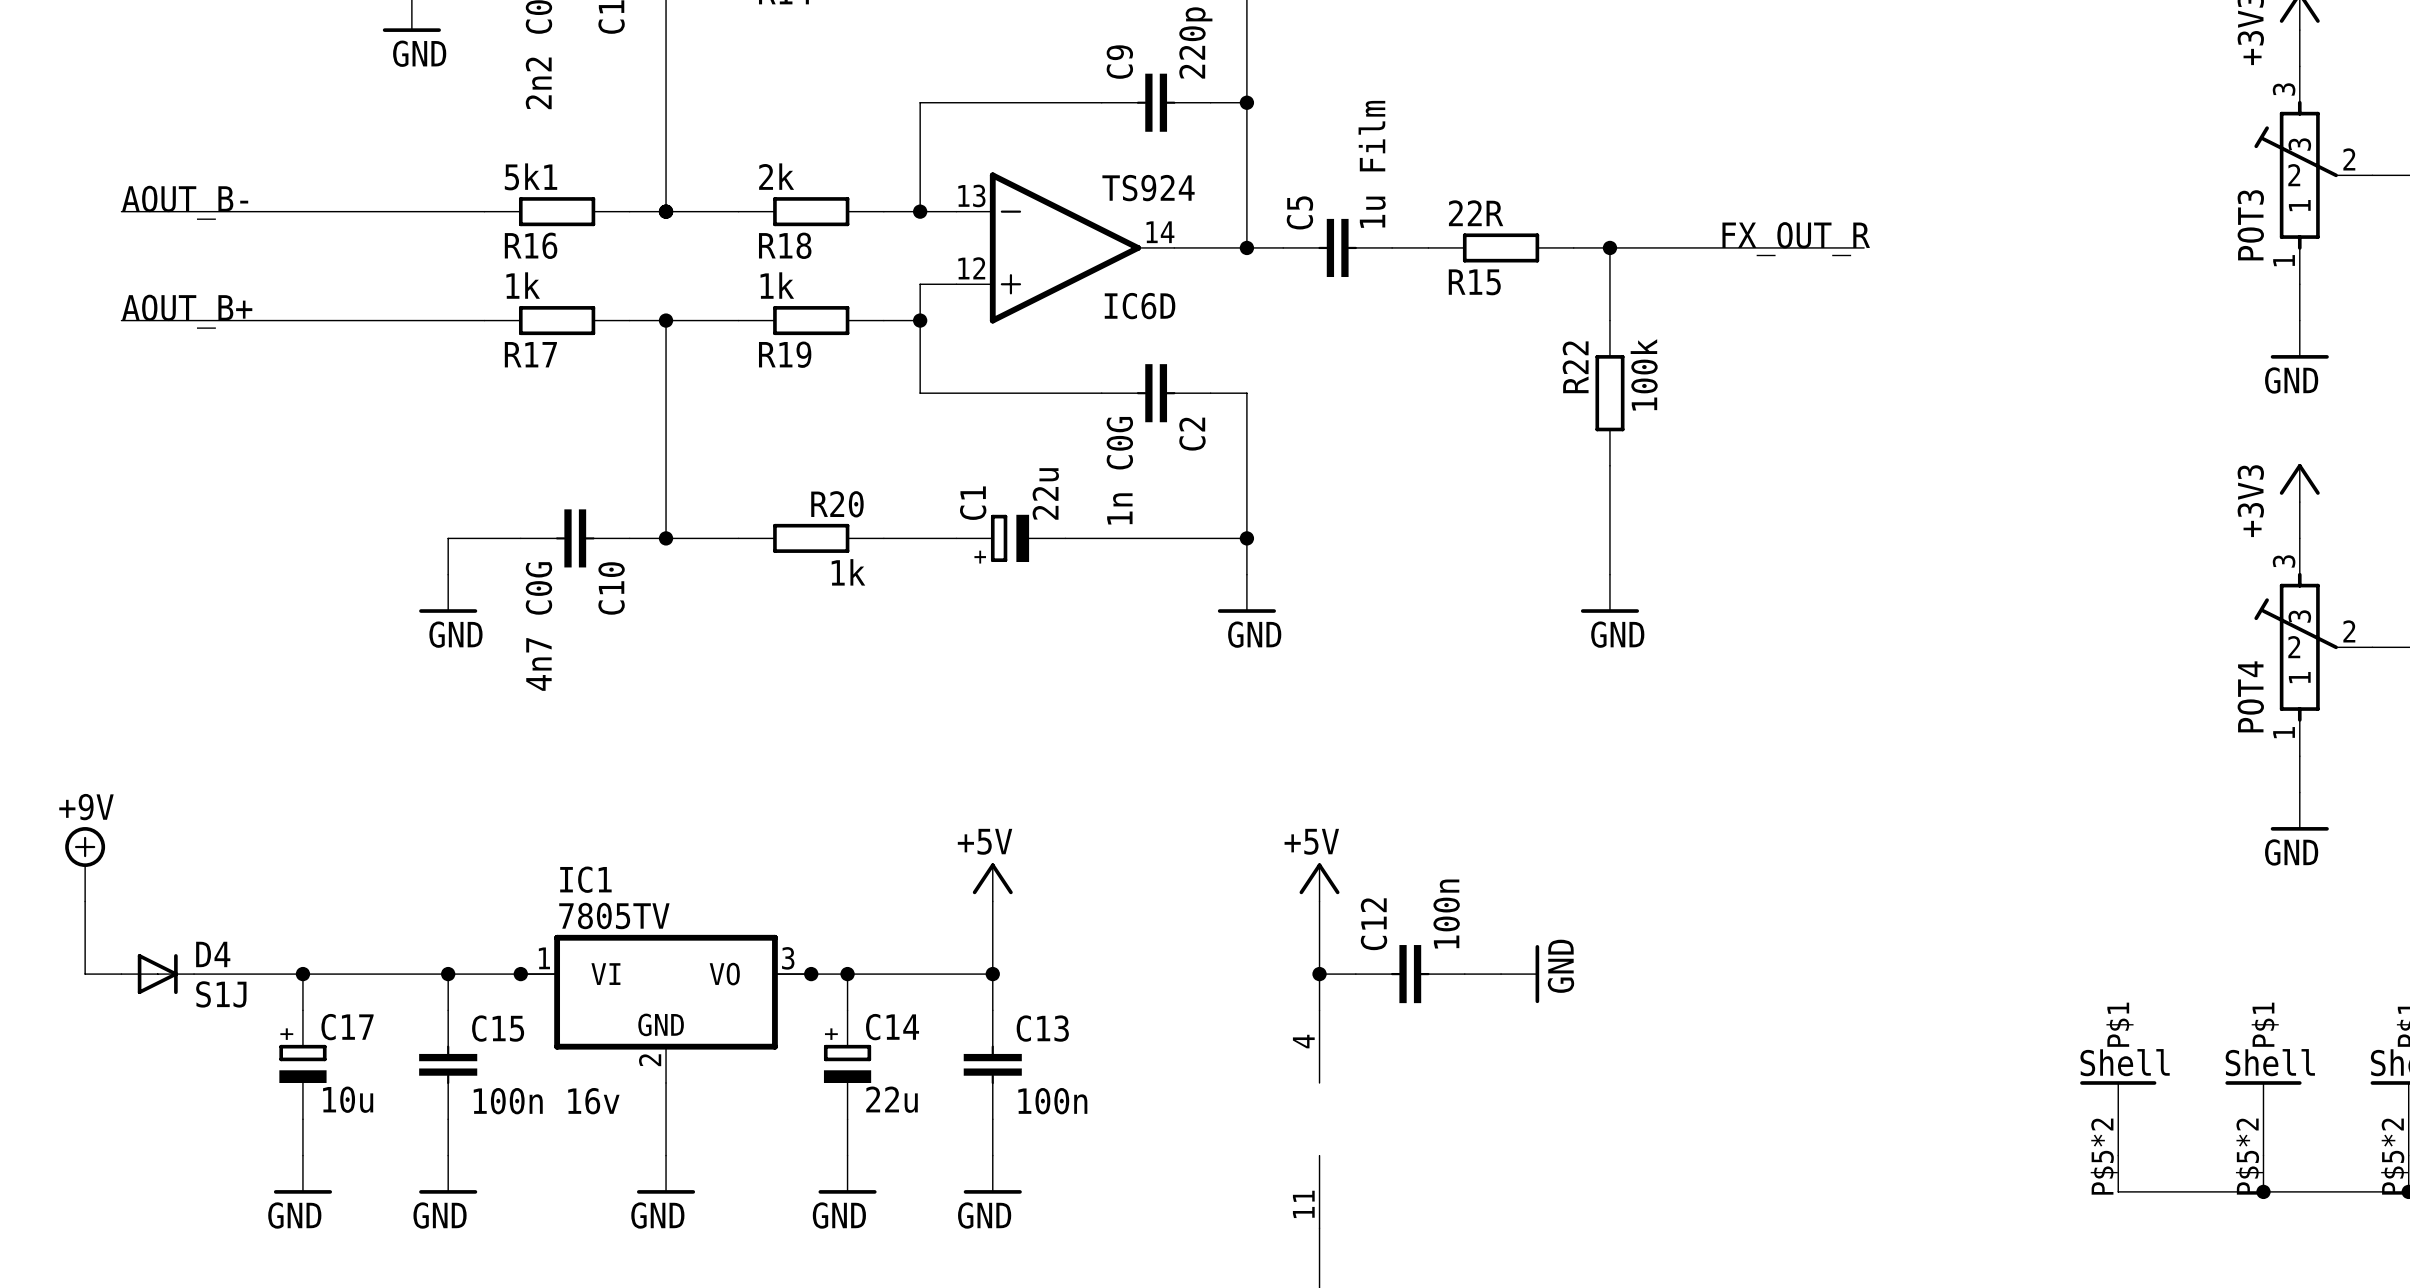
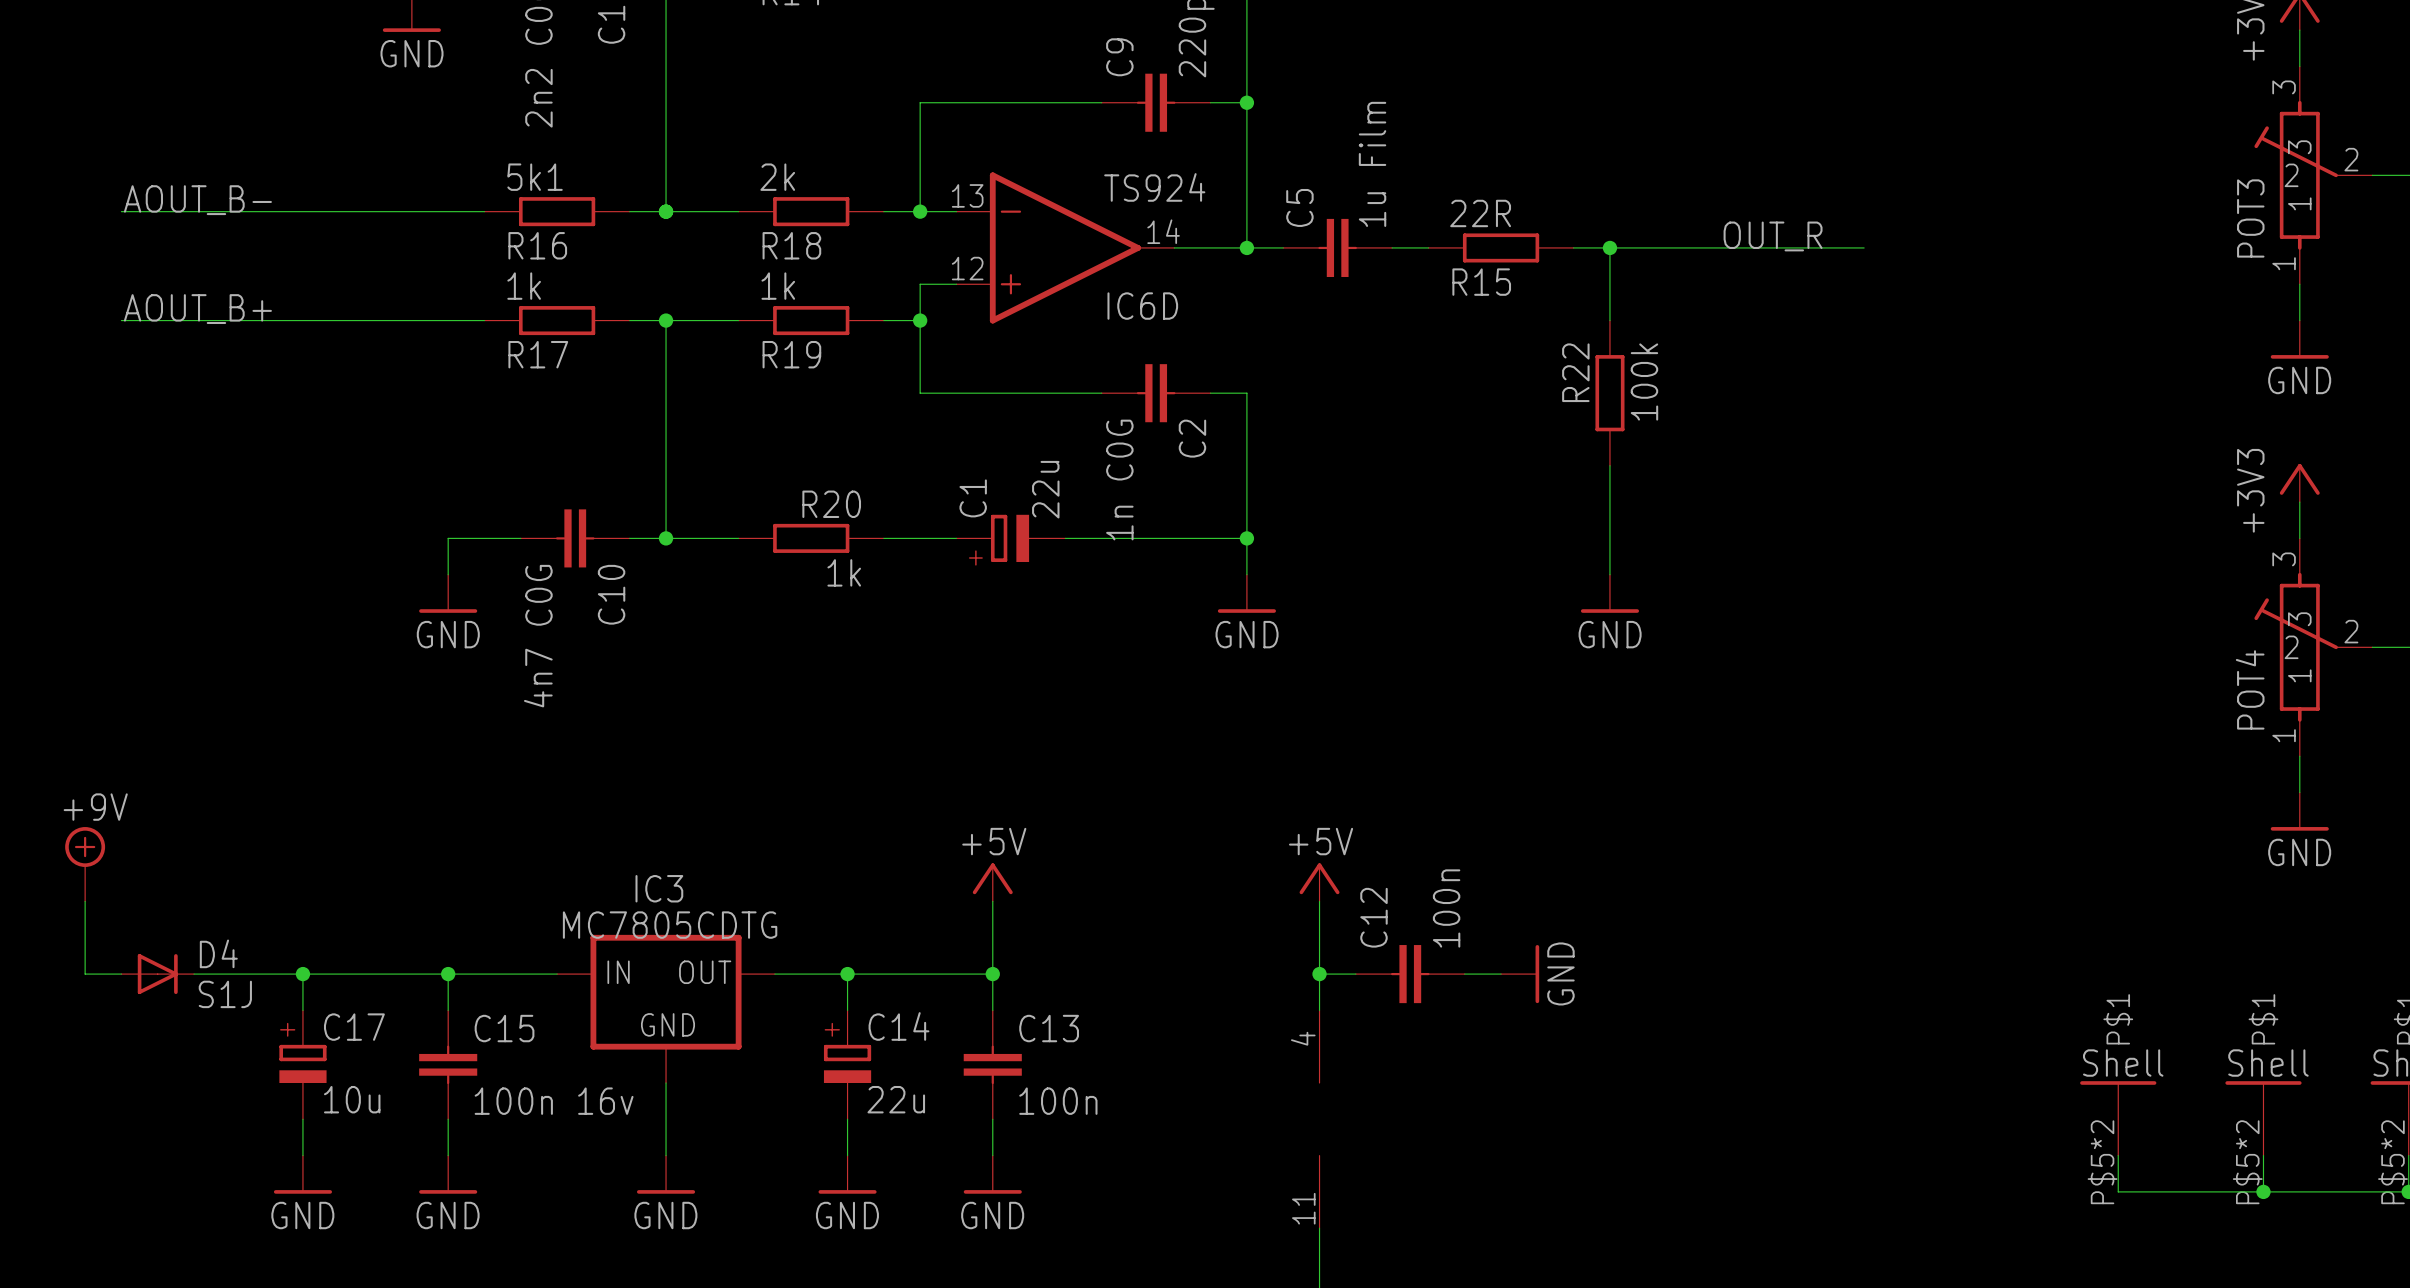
label: FX_OUT_R (1796, 239) -> OUT_R (1773, 236)
junction: (520, 974) -> none
junction: (811, 974) -> none
IC1: 7805TV (666, 1008) -> none
IC3: none -> MC7805CDTG (666, 1008)

